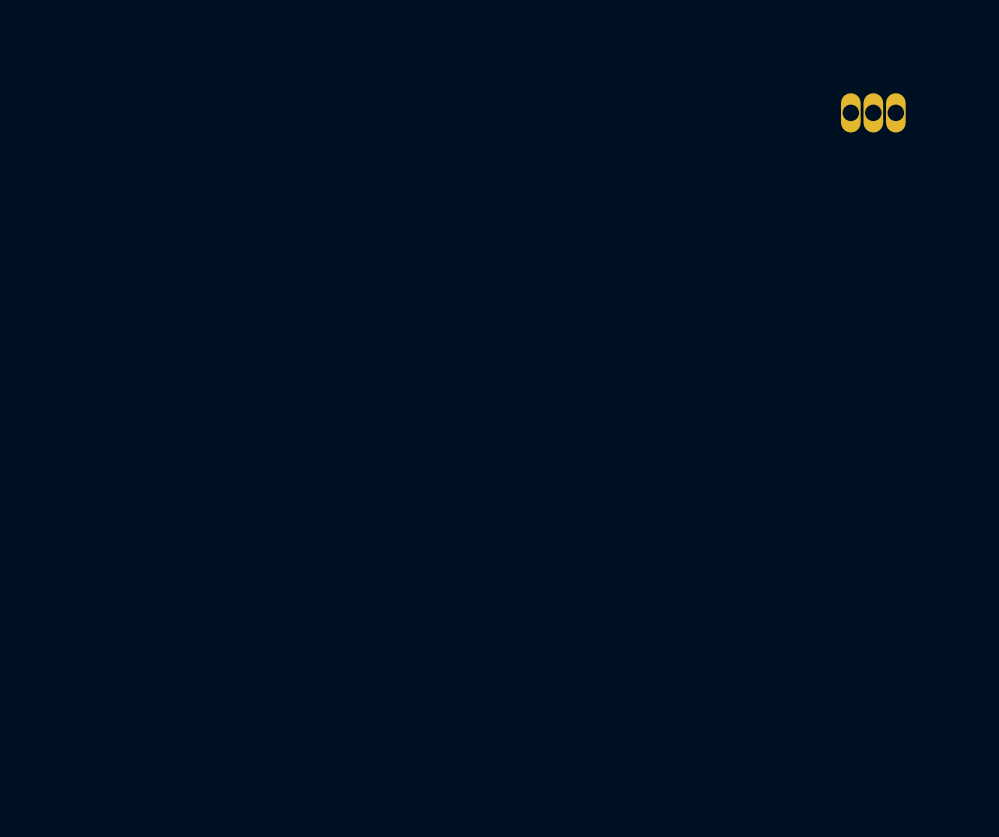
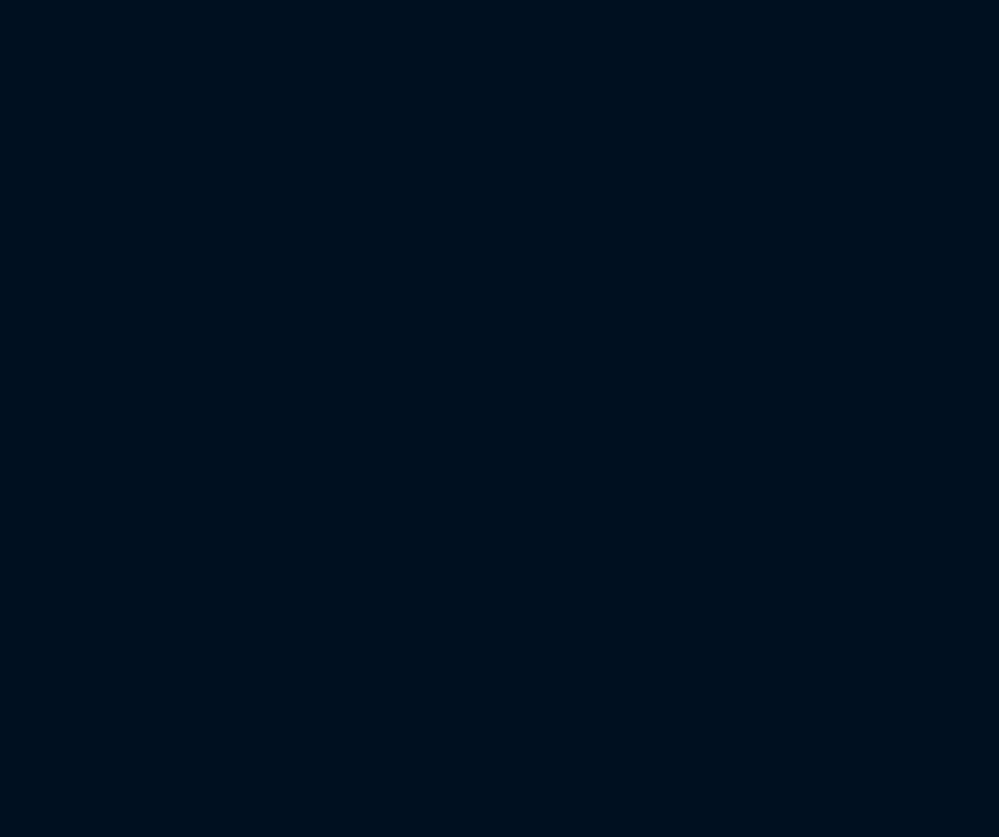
part: (873, 112) -> none

